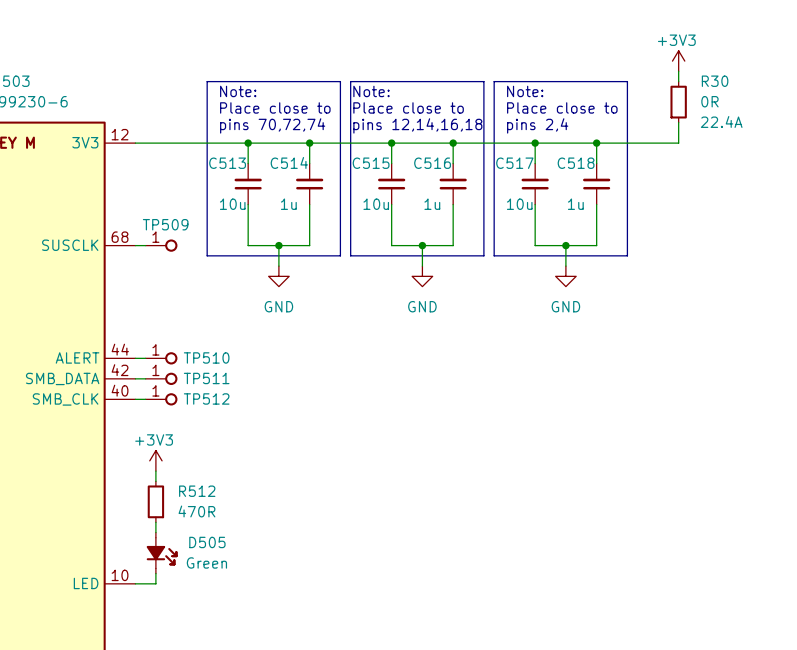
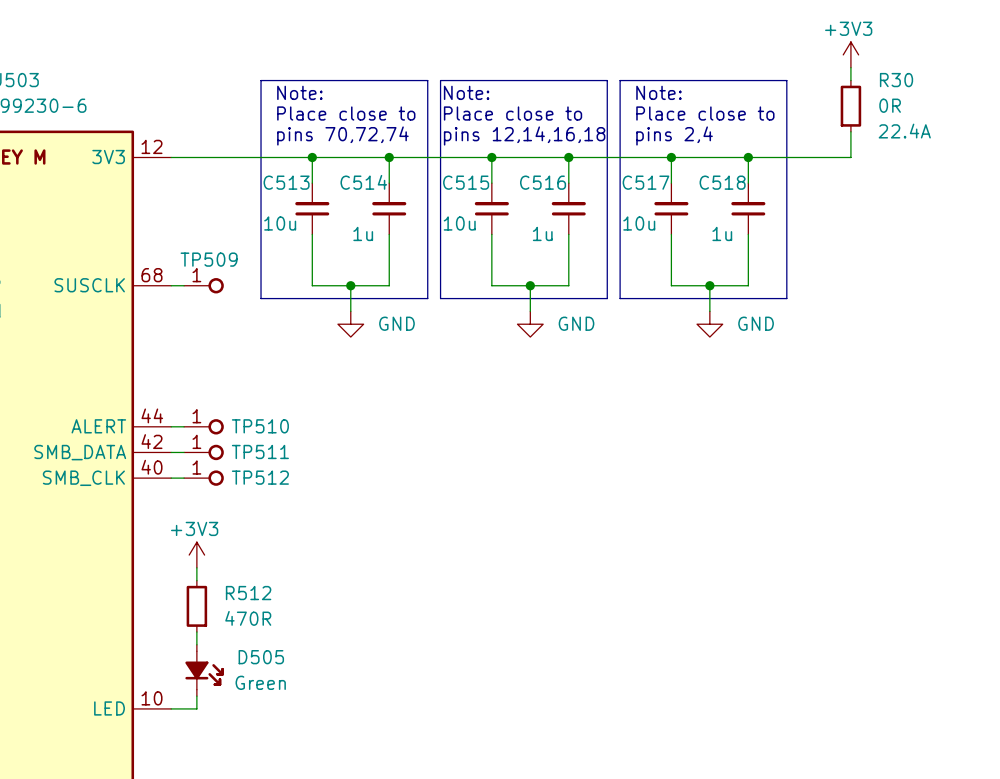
C513 text position: 10u (232, 204) -> 10u (280, 223)
C515 text position: 10u (376, 204) -> 10u (459, 223)
C517 text position: 10u (519, 204) -> 10u (639, 223)
power symbol text position: GND (278, 306) -> GND (396, 323)
power symbol text position: GND (422, 306) -> GND (576, 323)
power symbol text position: GND (565, 306) -> GND (756, 323)

